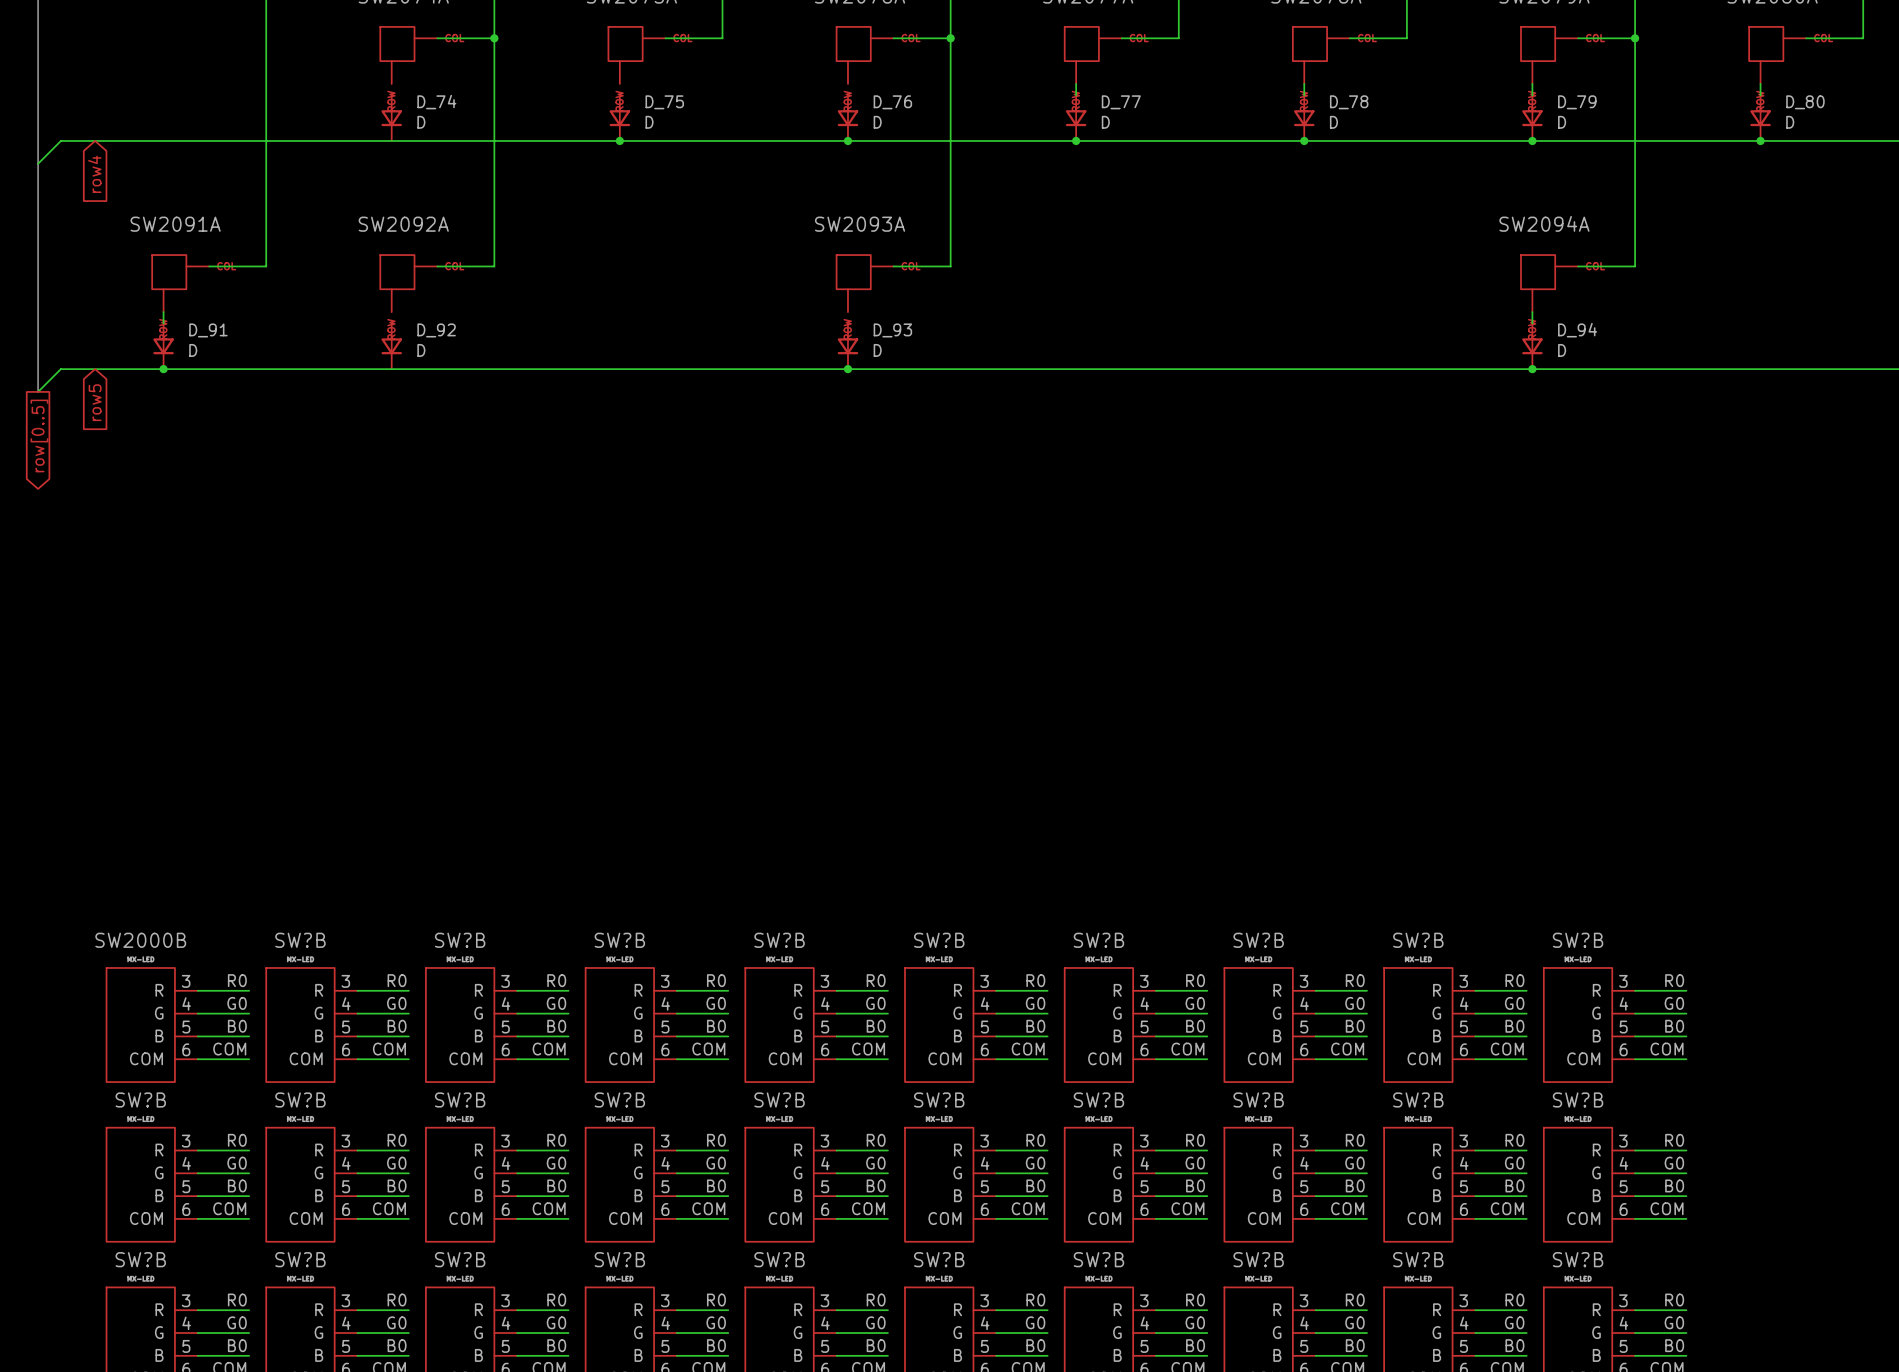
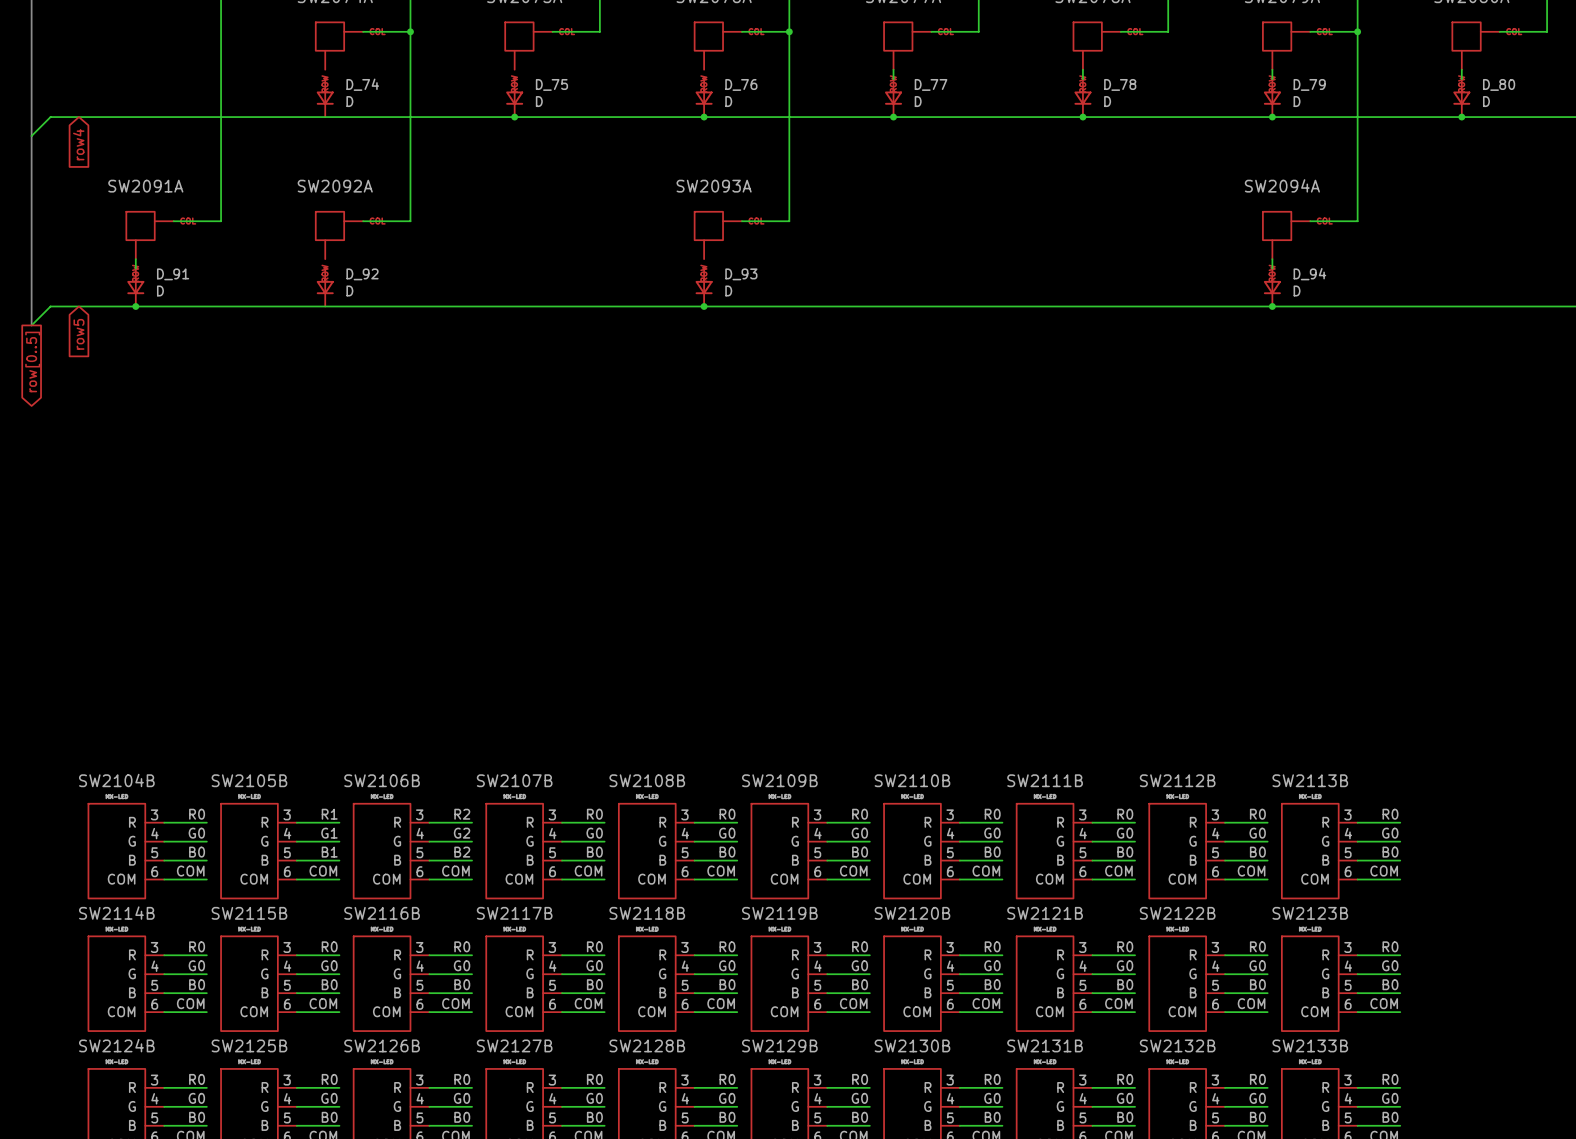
SW2000B name: SW2000B (140, 940) -> SW2104B (116, 780)
SW?B name: SW?B (300, 940) -> SW2105B (249, 780)
SW?B name: SW?B (460, 940) -> SW2106B (382, 780)
SW?B name: SW?B (619, 940) -> SW2107B (514, 780)
SW?B name: SW?B (779, 940) -> SW2108B (647, 780)
SW?B name: SW?B (939, 940) -> SW2109B (779, 780)
SW?B name: SW?B (1098, 940) -> SW2110B (912, 780)
SW?B name: SW?B (1258, 940) -> SW2111B (1045, 780)
SW?B name: SW?B (1418, 940) -> SW2112B (1177, 780)
SW?B name: SW?B (1578, 940) -> SW2113B (1310, 780)
label: R0 (397, 980) -> R1 (329, 814)
label: R0 (556, 980) -> R2 (462, 814)
label: G0 (396, 1003) -> G1 (329, 833)
label: G0 (556, 1003) -> G2 (462, 833)
label: B0 (397, 1026) -> B1 (329, 852)
label: B0 (556, 1026) -> B2 (462, 852)
SW?B name: SW?B (140, 1099) -> SW2114B (116, 913)
SW?B name: SW?B (300, 1099) -> SW2115B (249, 913)
SW?B name: SW?B (460, 1099) -> SW2116B (382, 913)
SW?B name: SW?B (619, 1099) -> SW2117B (514, 913)
SW?B name: SW?B (779, 1099) -> SW2118B (647, 913)
SW?B name: SW?B (939, 1099) -> SW2119B (779, 913)
SW?B name: SW?B (1098, 1099) -> SW2120B (912, 913)
SW?B name: SW?B (1258, 1099) -> SW2121B (1045, 913)
SW?B name: SW?B (1418, 1099) -> SW2122B (1177, 913)
SW?B name: SW?B (1578, 1099) -> SW2123B (1310, 913)
SW?B name: SW?B (140, 1259) -> SW2124B (116, 1045)
SW?B name: SW?B (300, 1259) -> SW2125B (249, 1045)
SW?B name: SW?B (460, 1259) -> SW2126B (382, 1045)
SW?B name: SW?B (619, 1259) -> SW2127B (514, 1045)
SW?B name: SW?B (779, 1259) -> SW2128B (647, 1045)
SW?B name: SW?B (939, 1259) -> SW2129B (779, 1045)
SW?B name: SW?B (1098, 1259) -> SW2130B (912, 1045)
SW?B name: SW?B (1258, 1259) -> SW2131B (1045, 1045)
SW?B name: SW?B (1418, 1259) -> SW2132B (1177, 1045)
SW?B name: SW?B (1578, 1259) -> SW2133B (1310, 1045)

